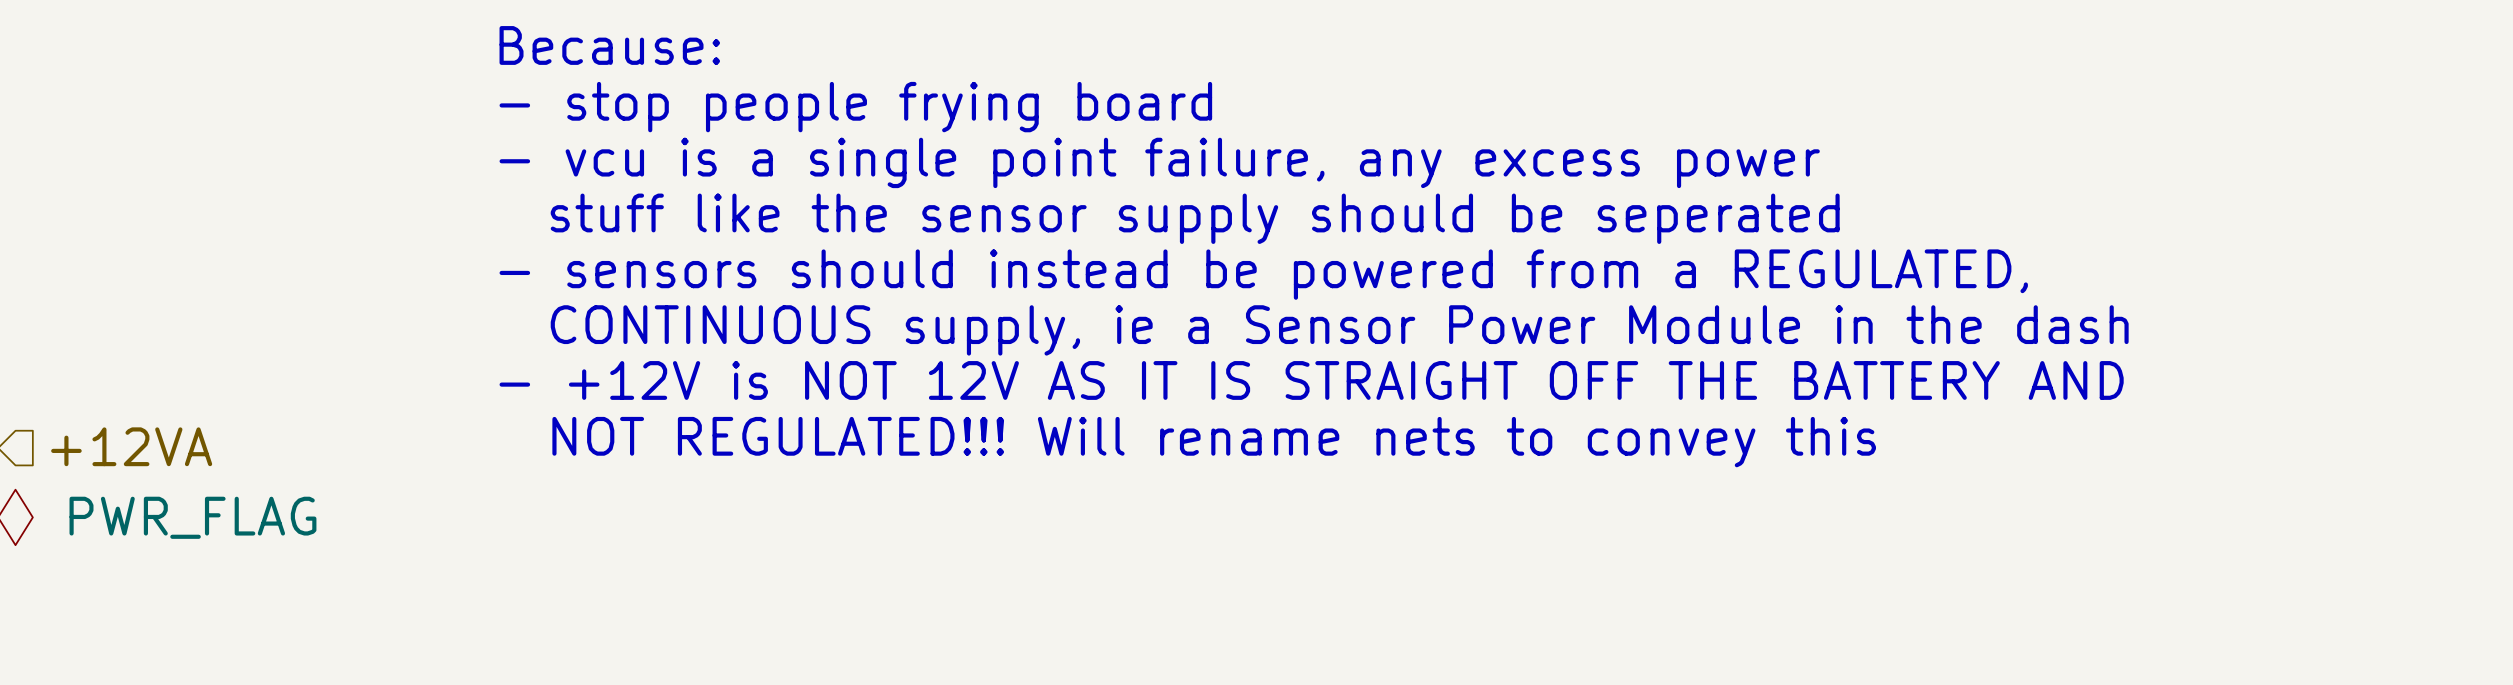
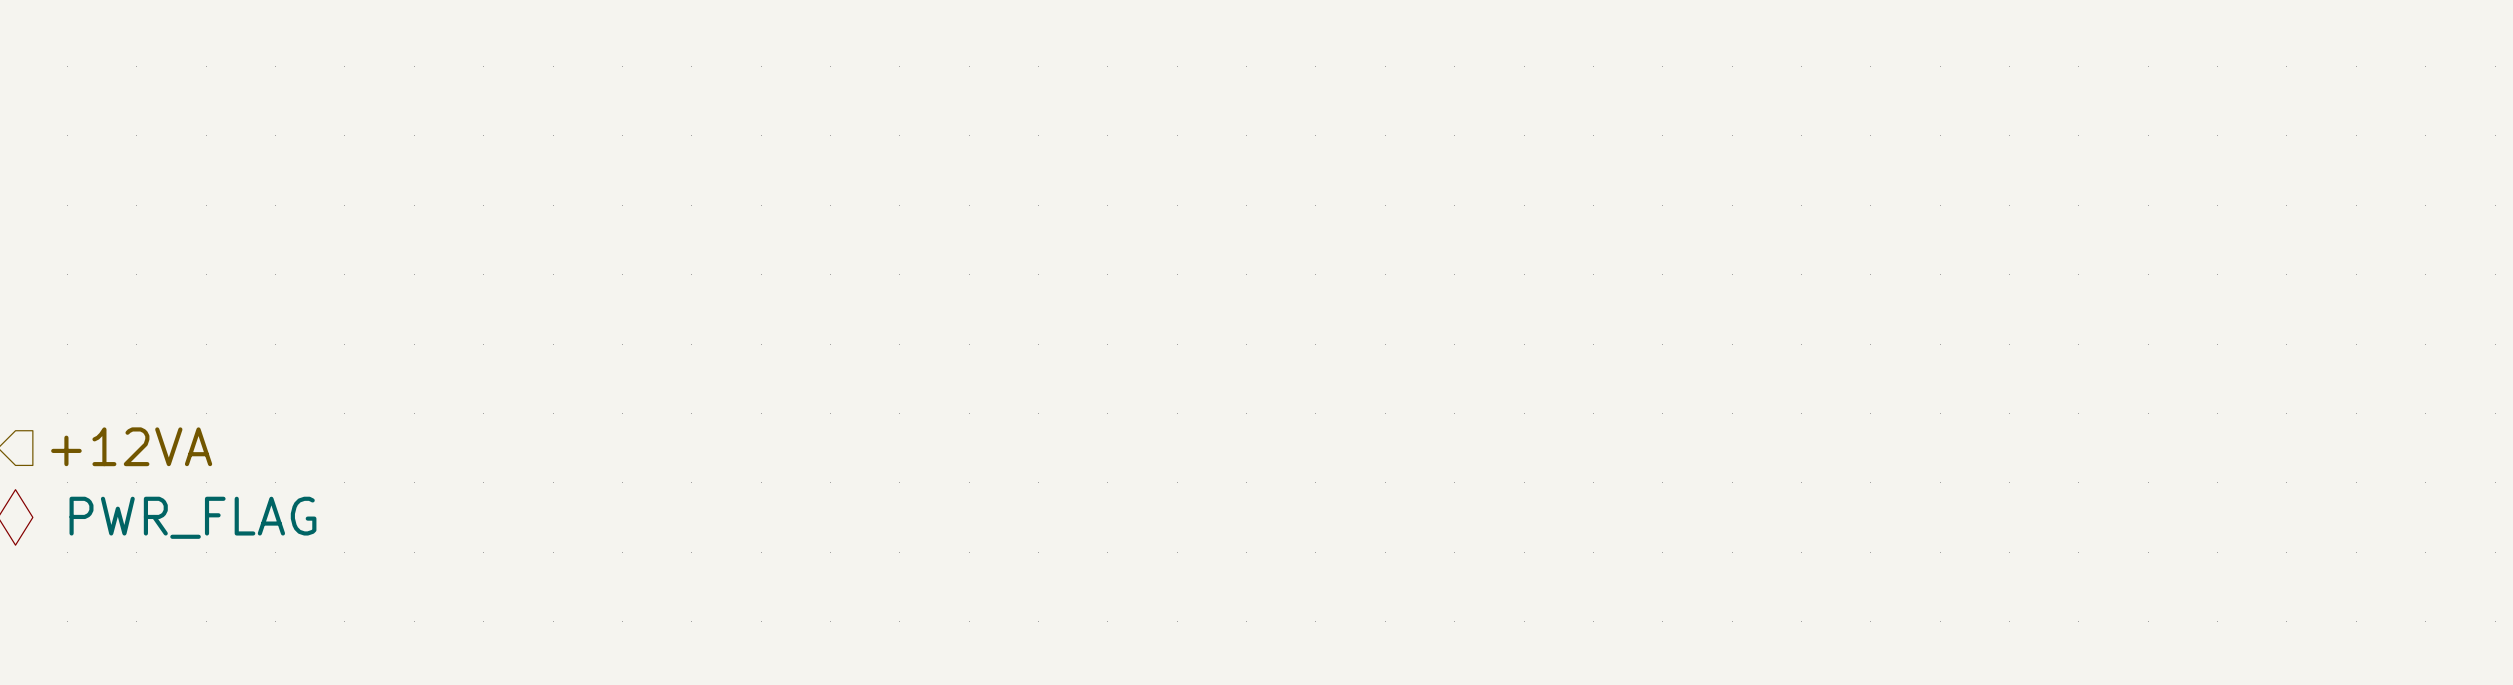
text: Because: (609, 45) -> none
text: - stop people frying board (855, 107) -> none
text: - vcu is a single point failure, any excess power (1159, 162) -> none
text: stuff like the sensor supply should be seperated (1195, 218) -> none
text: - sensors should instead be powered from a REGULATED, (1263, 274) -> none
text: CONTINUOUS supply, ie a Sensor Power Module in the dash (1339, 330) -> none
text: - +12V is NOT 12V AS IT IS STRAIGHT OFF THE BATTERY AND (1311, 380) -> none
text: NOT REGULATED!!! Will rename nets to convey this (1214, 442) -> none

